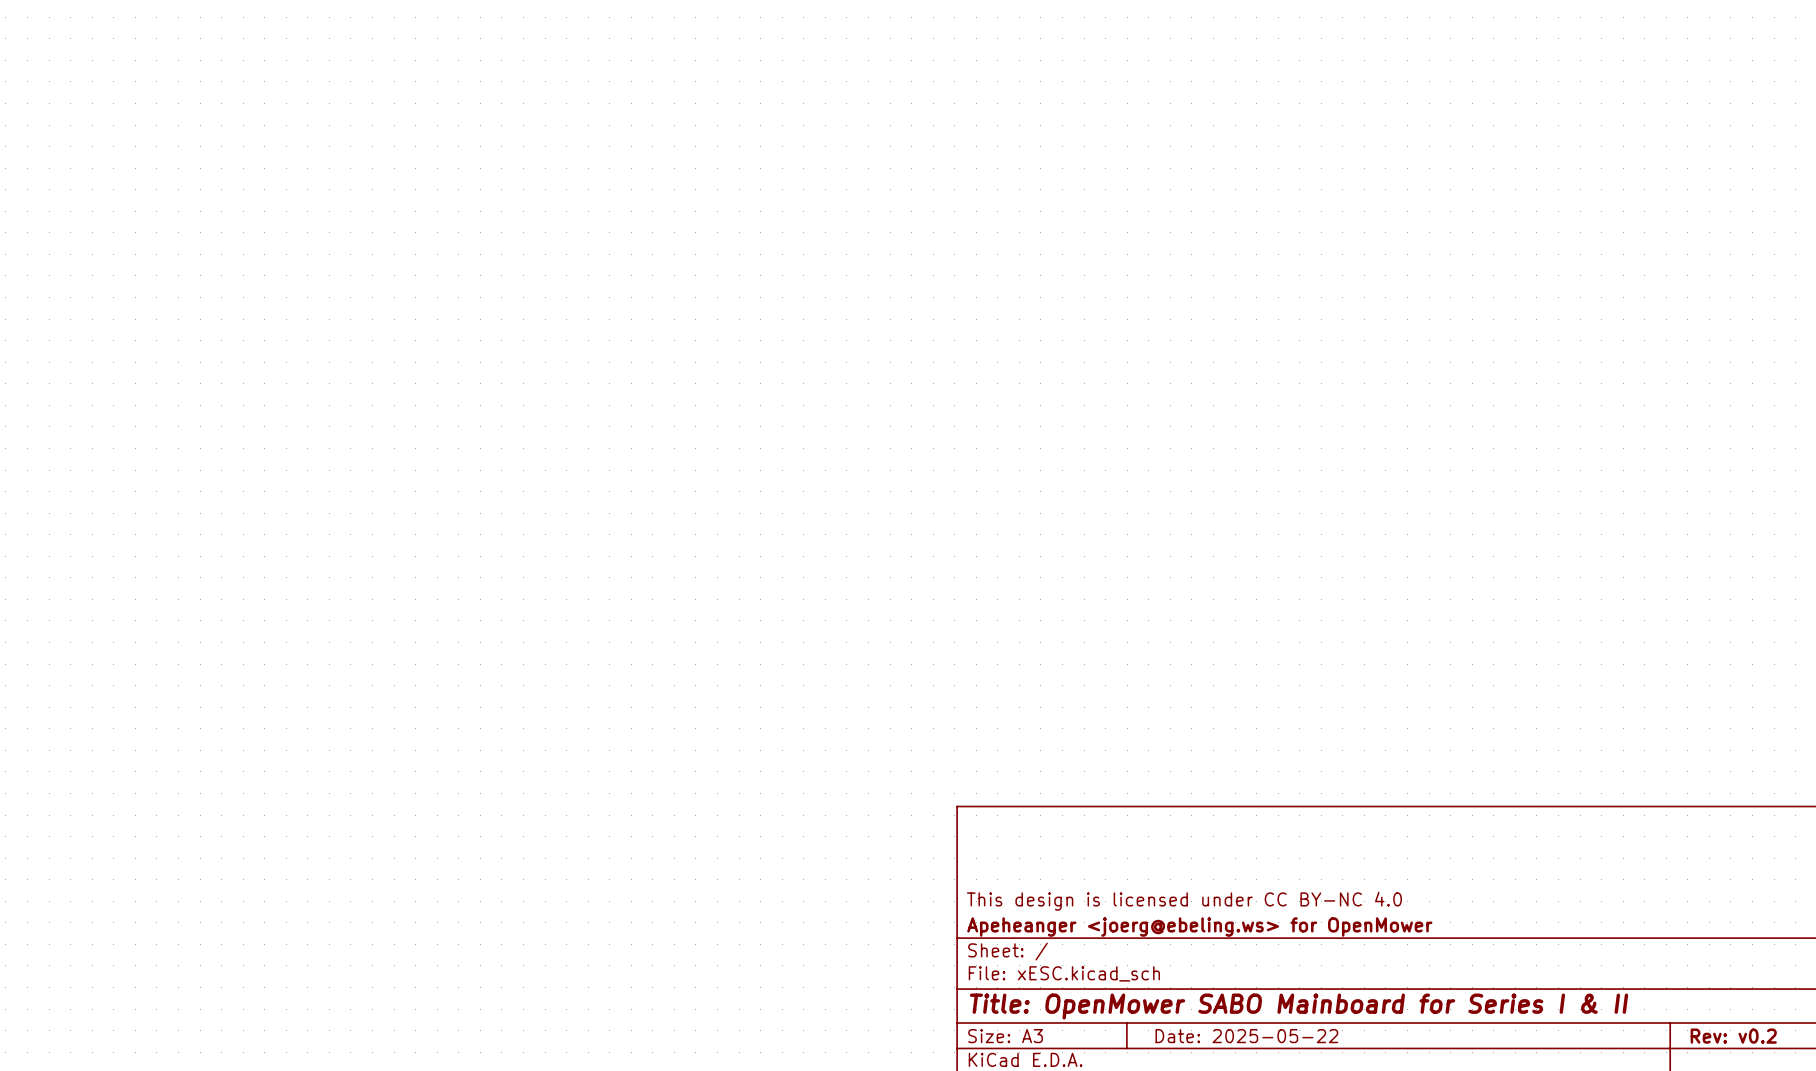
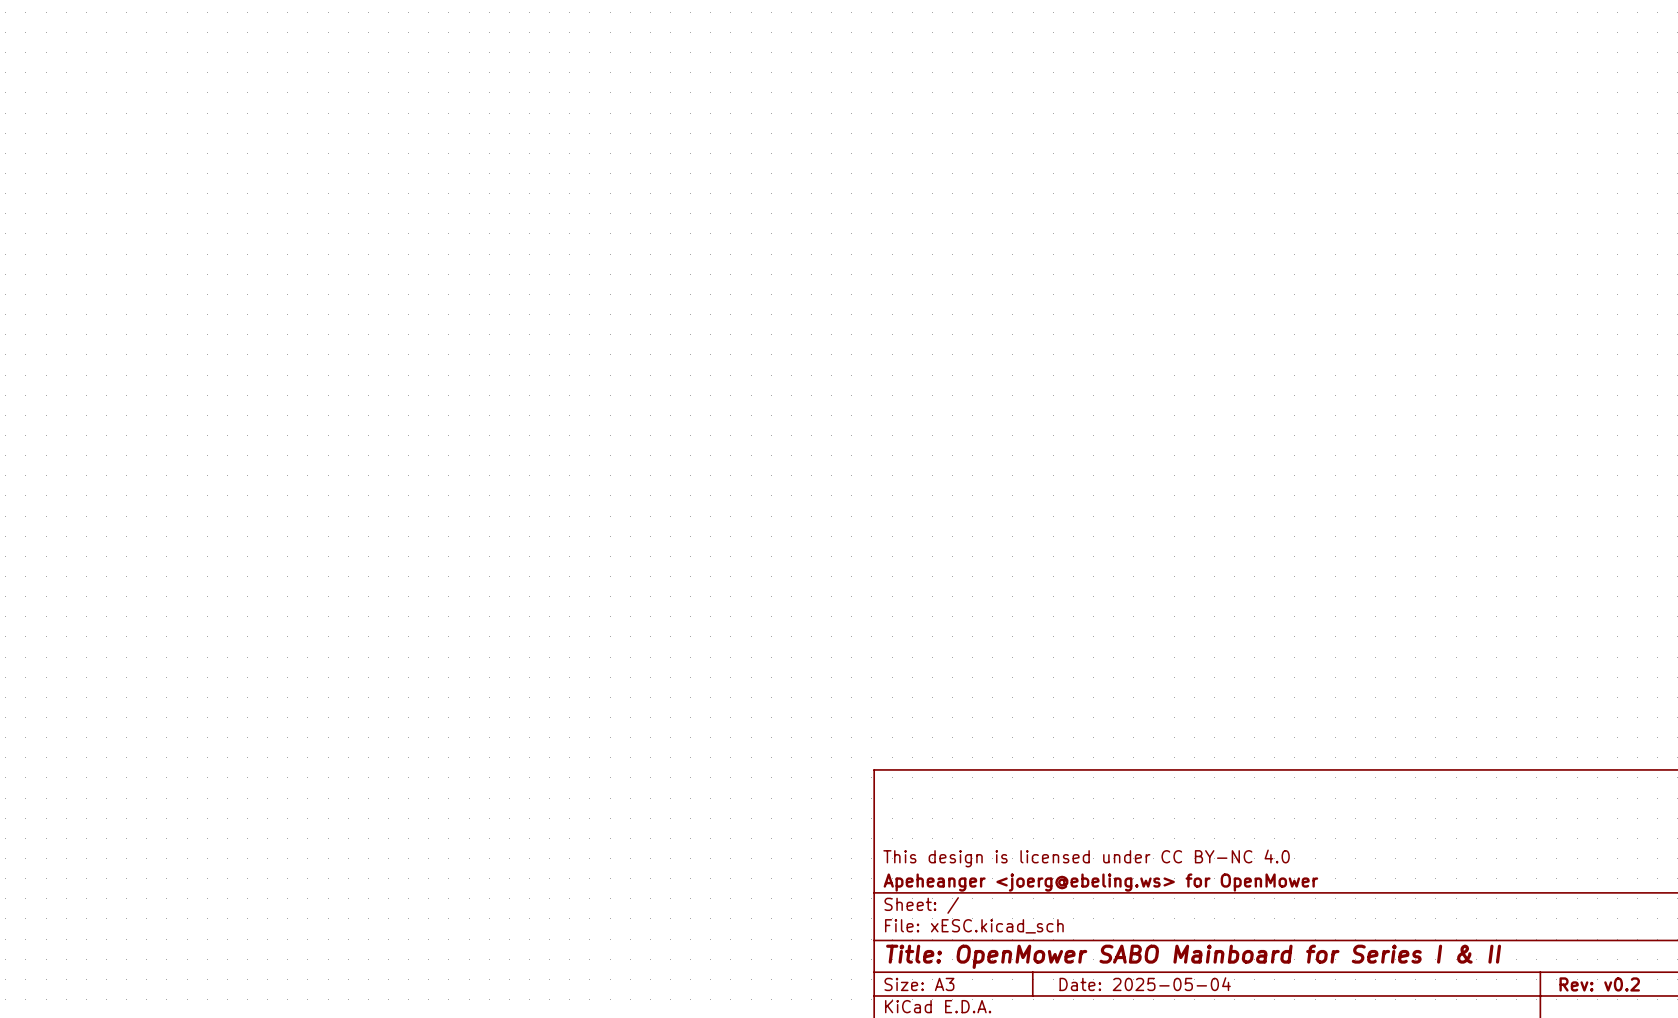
title block: Date: 2025-05-22 (1246, 1036) -> Date: 2025-05-04 (1145, 984)

